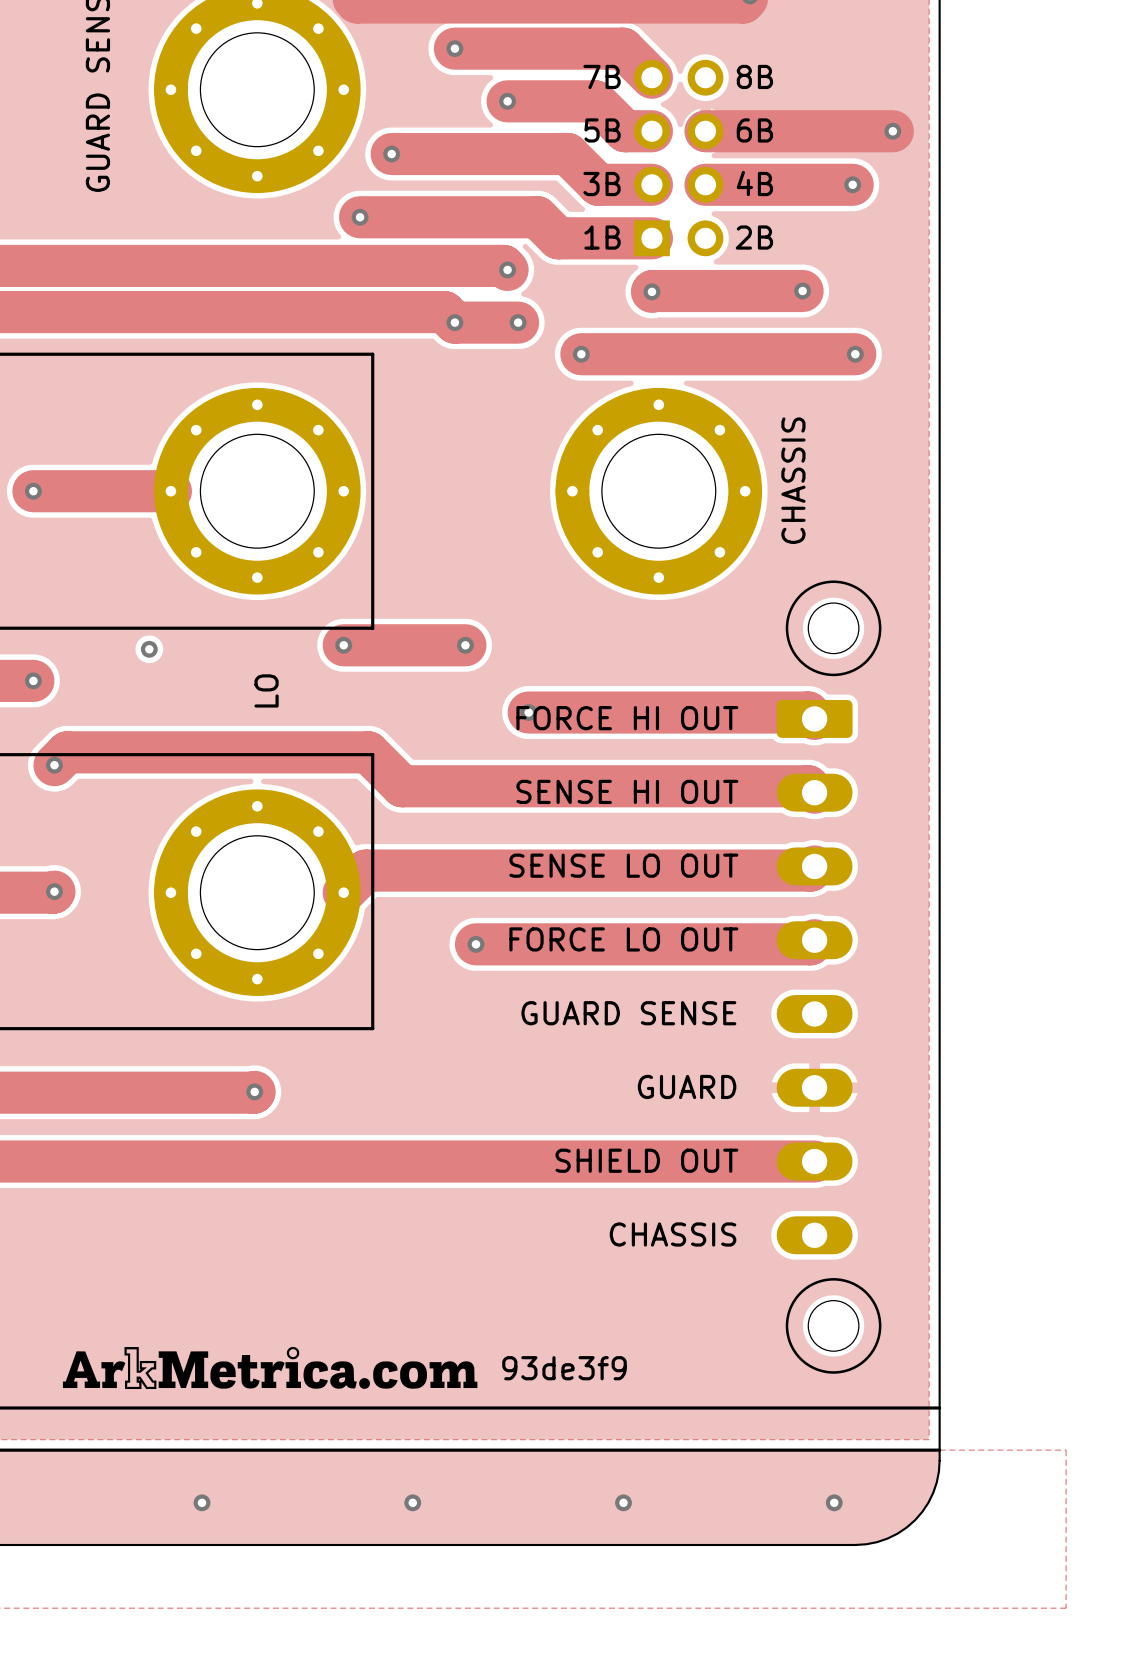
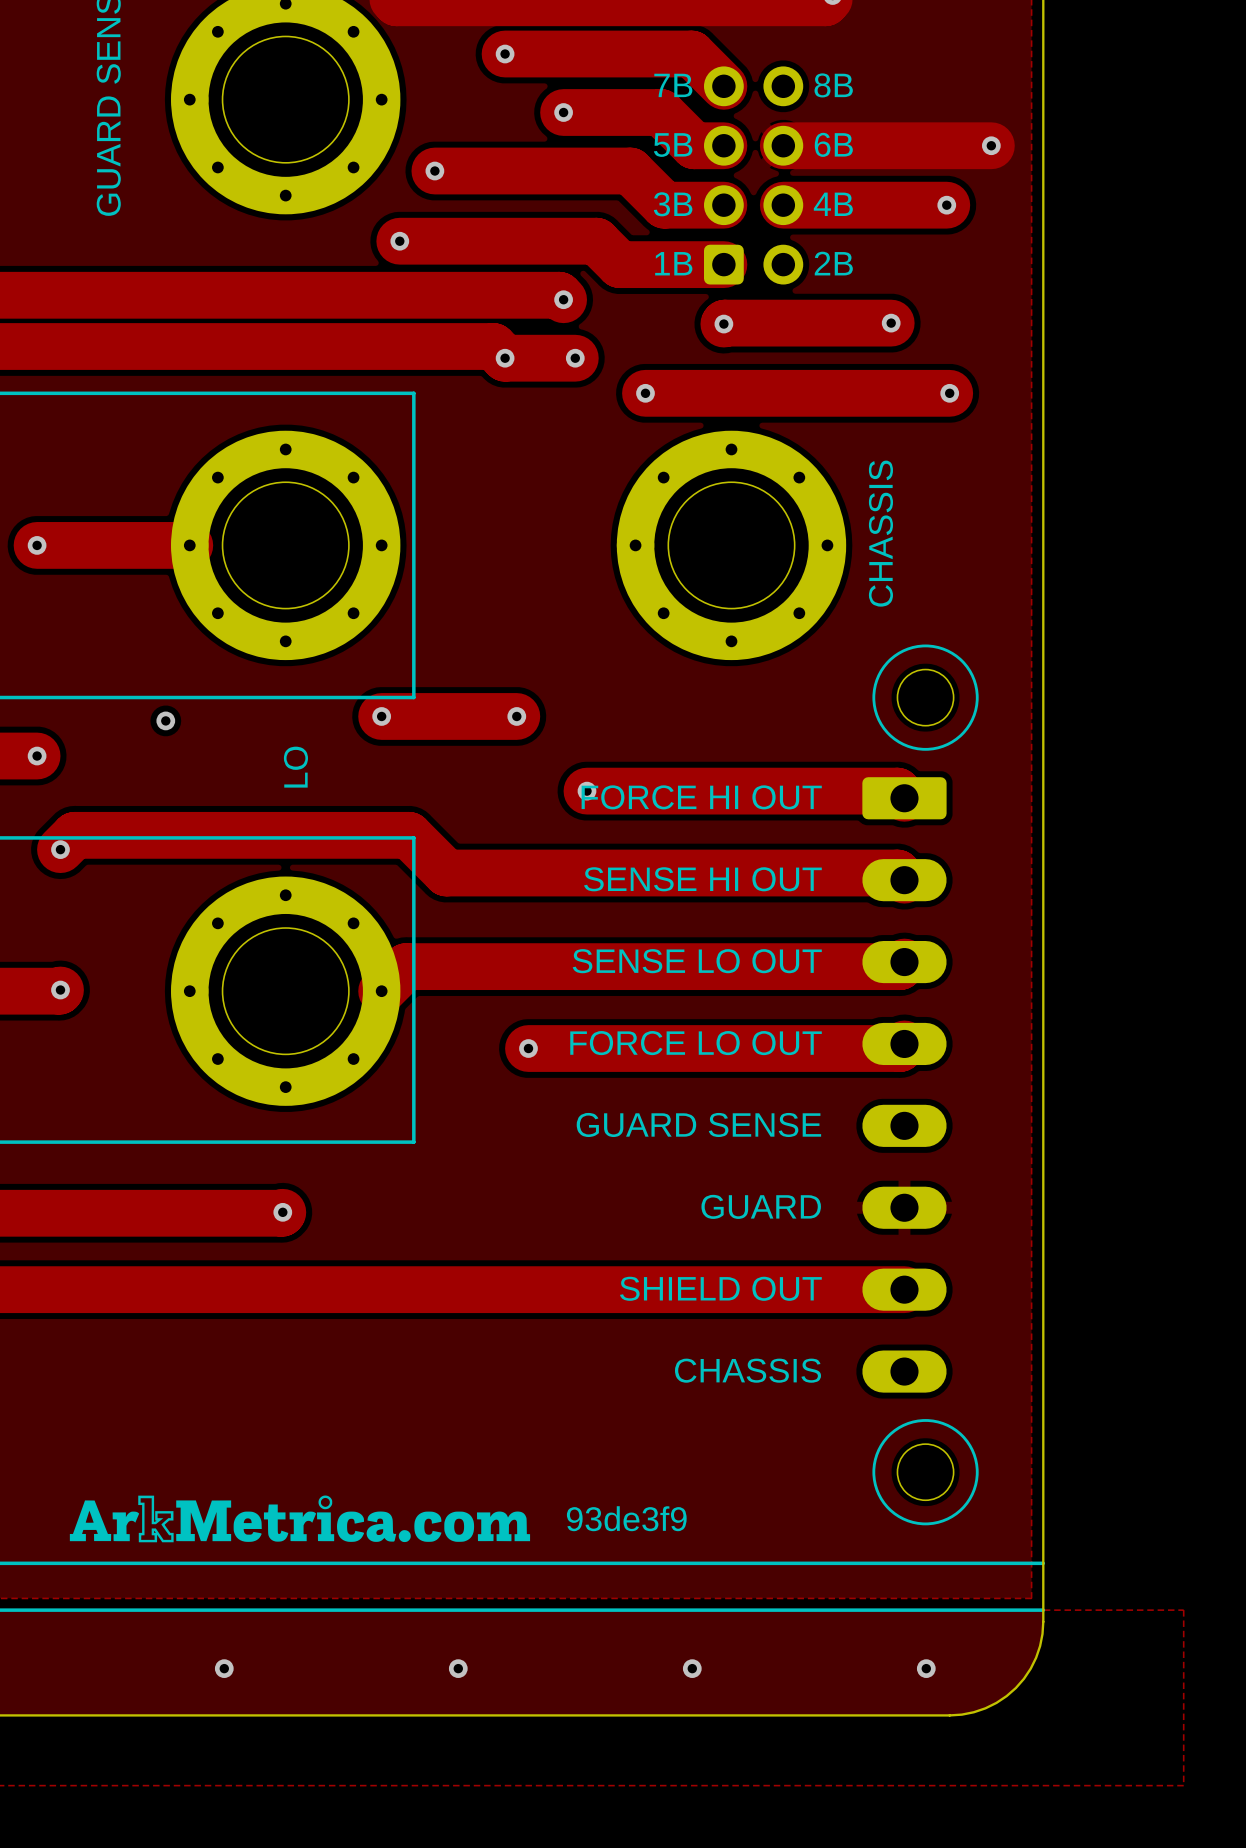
part footprint: [634, 59, 724, 257] -> [704, 66, 804, 285]

